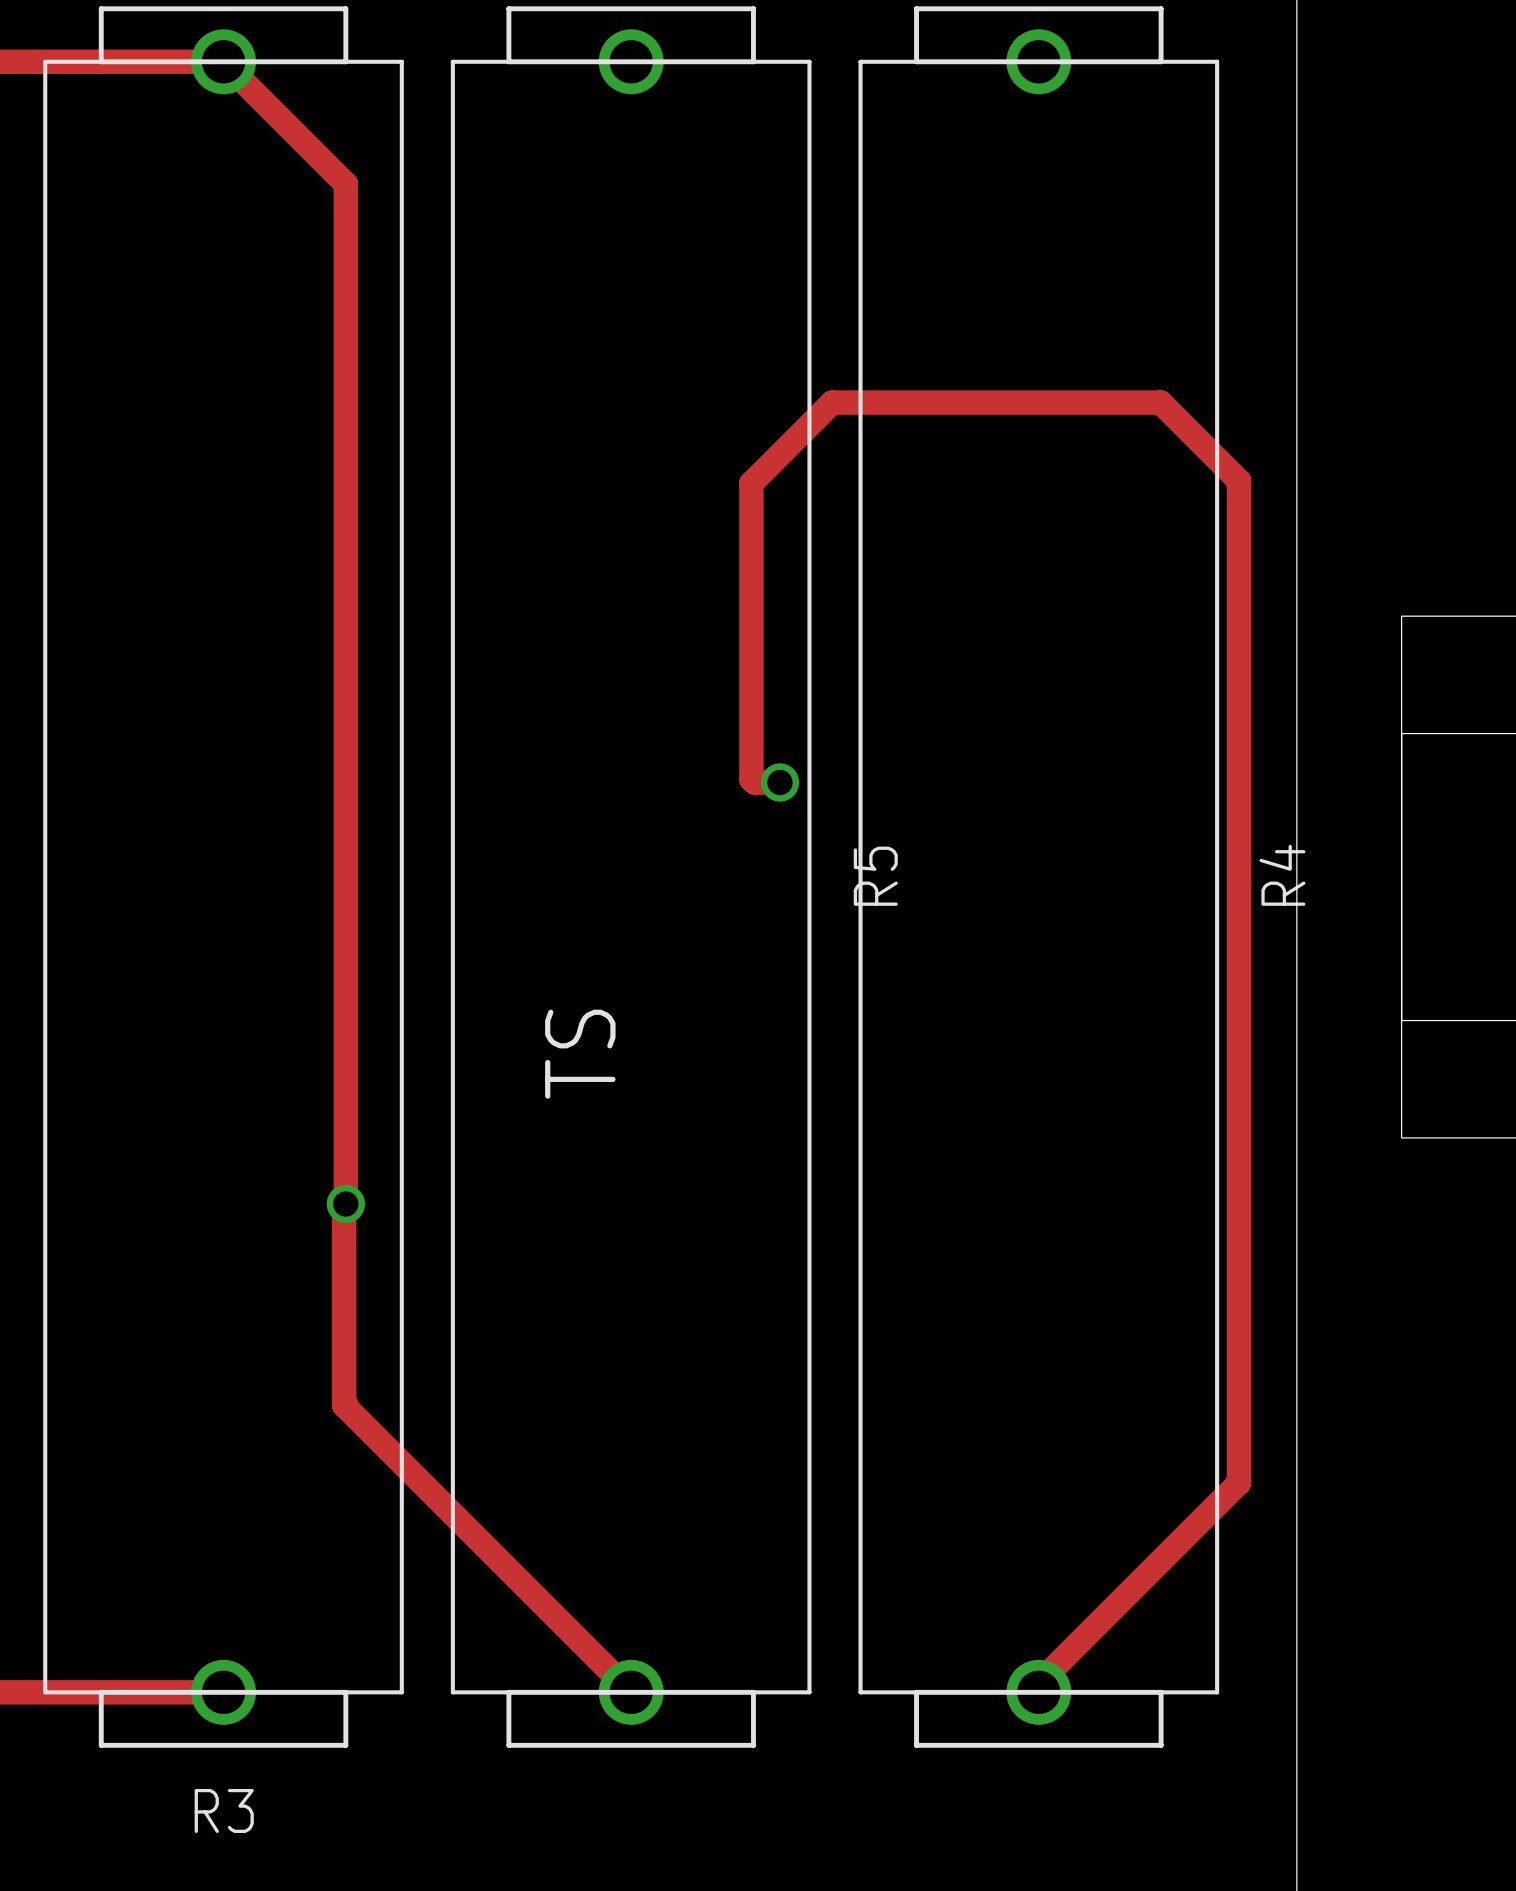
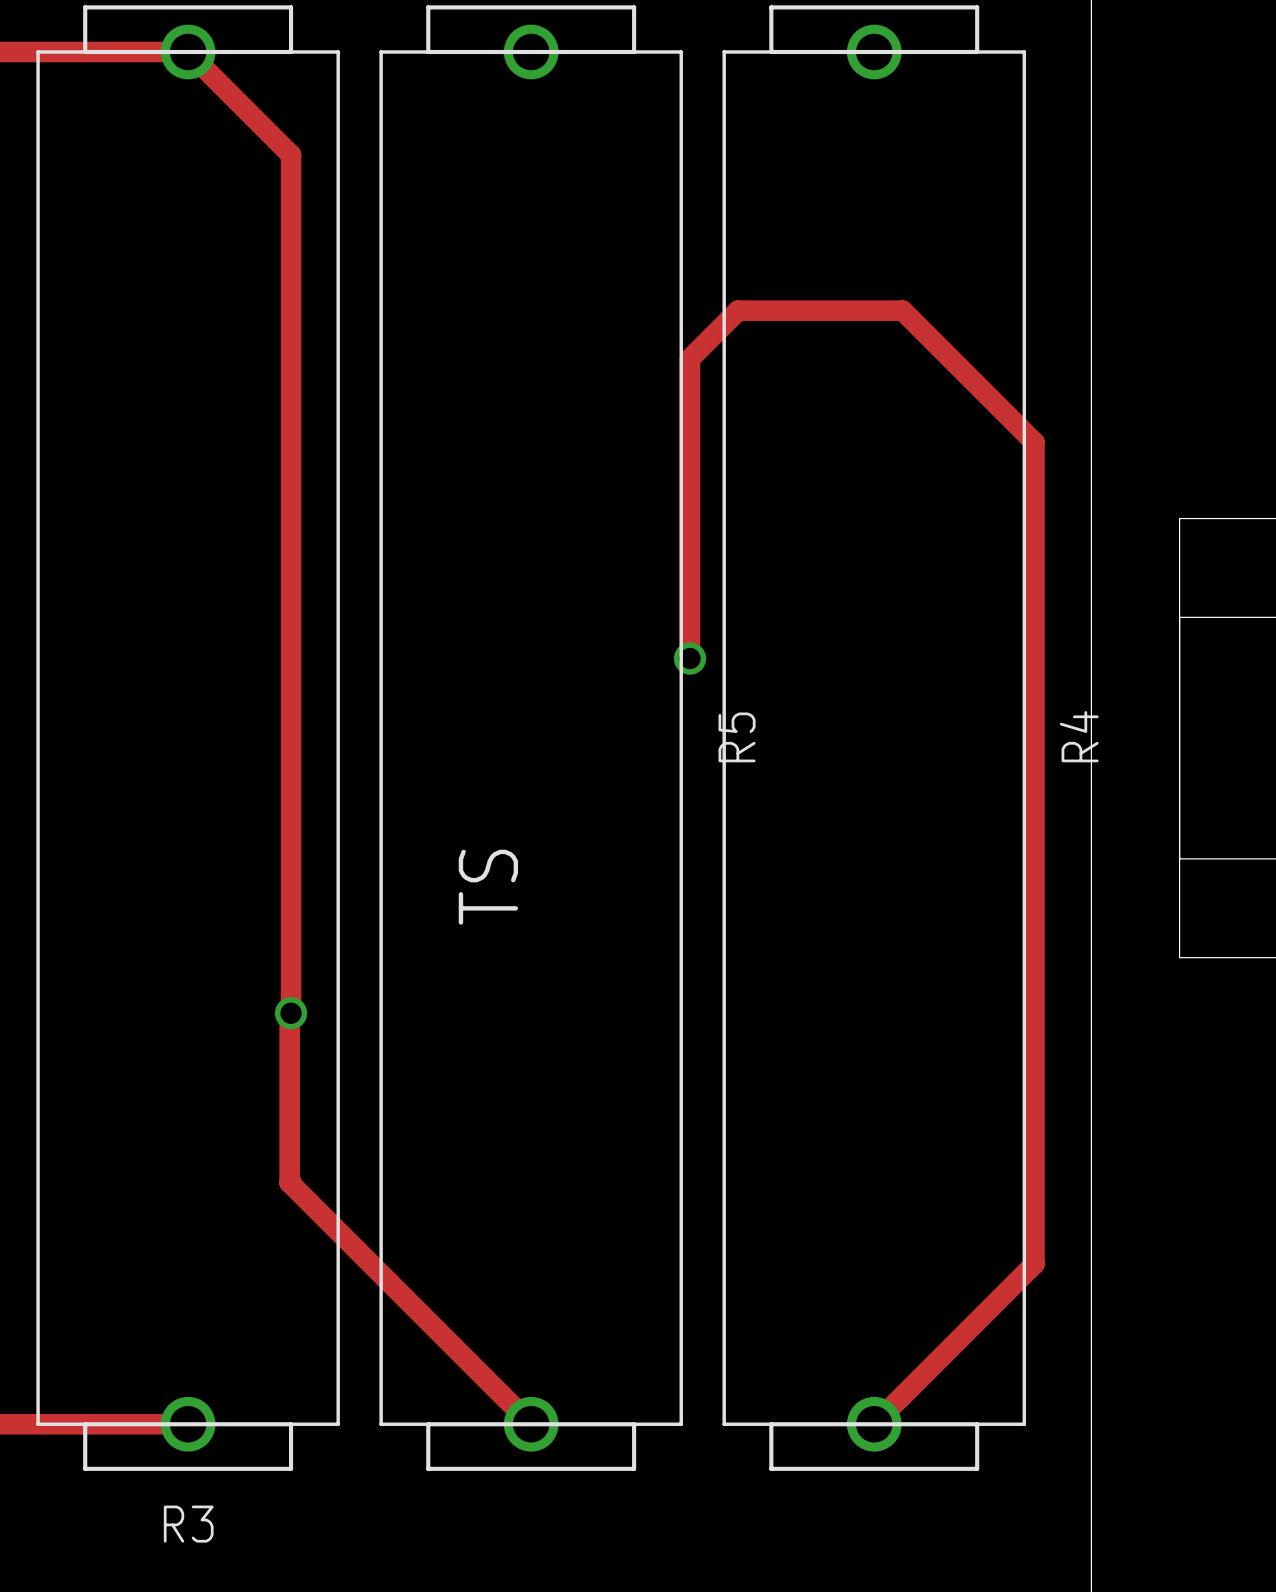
track: (779, 782) (754, 782) (751, 779) (751, 483) (832, 402) (1160, 402) (1238, 480) (1238, 1482) (1038, 1682) (1038, 1692) -> (690, 658) (690, 358) (738, 310) (902, 310) (1034, 442) (1034, 1264) (874, 1424)
via position: (779, 782) -> (690, 658)

